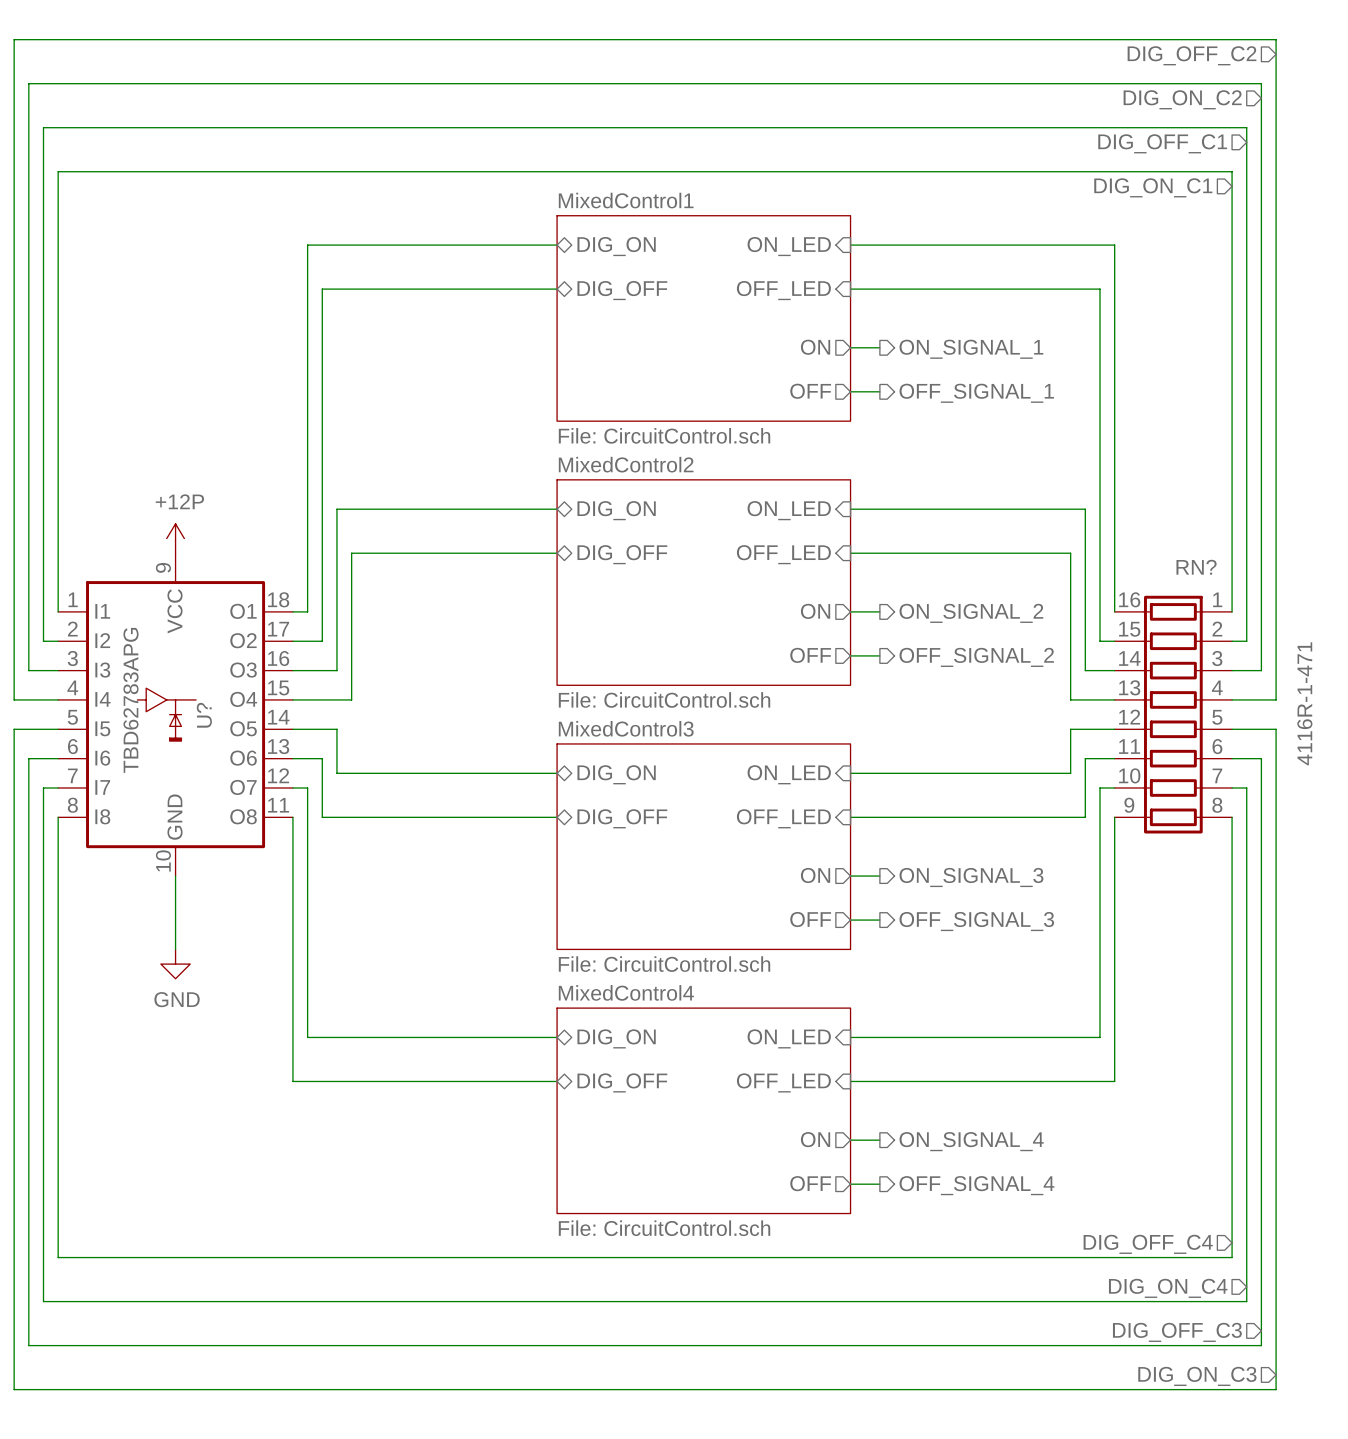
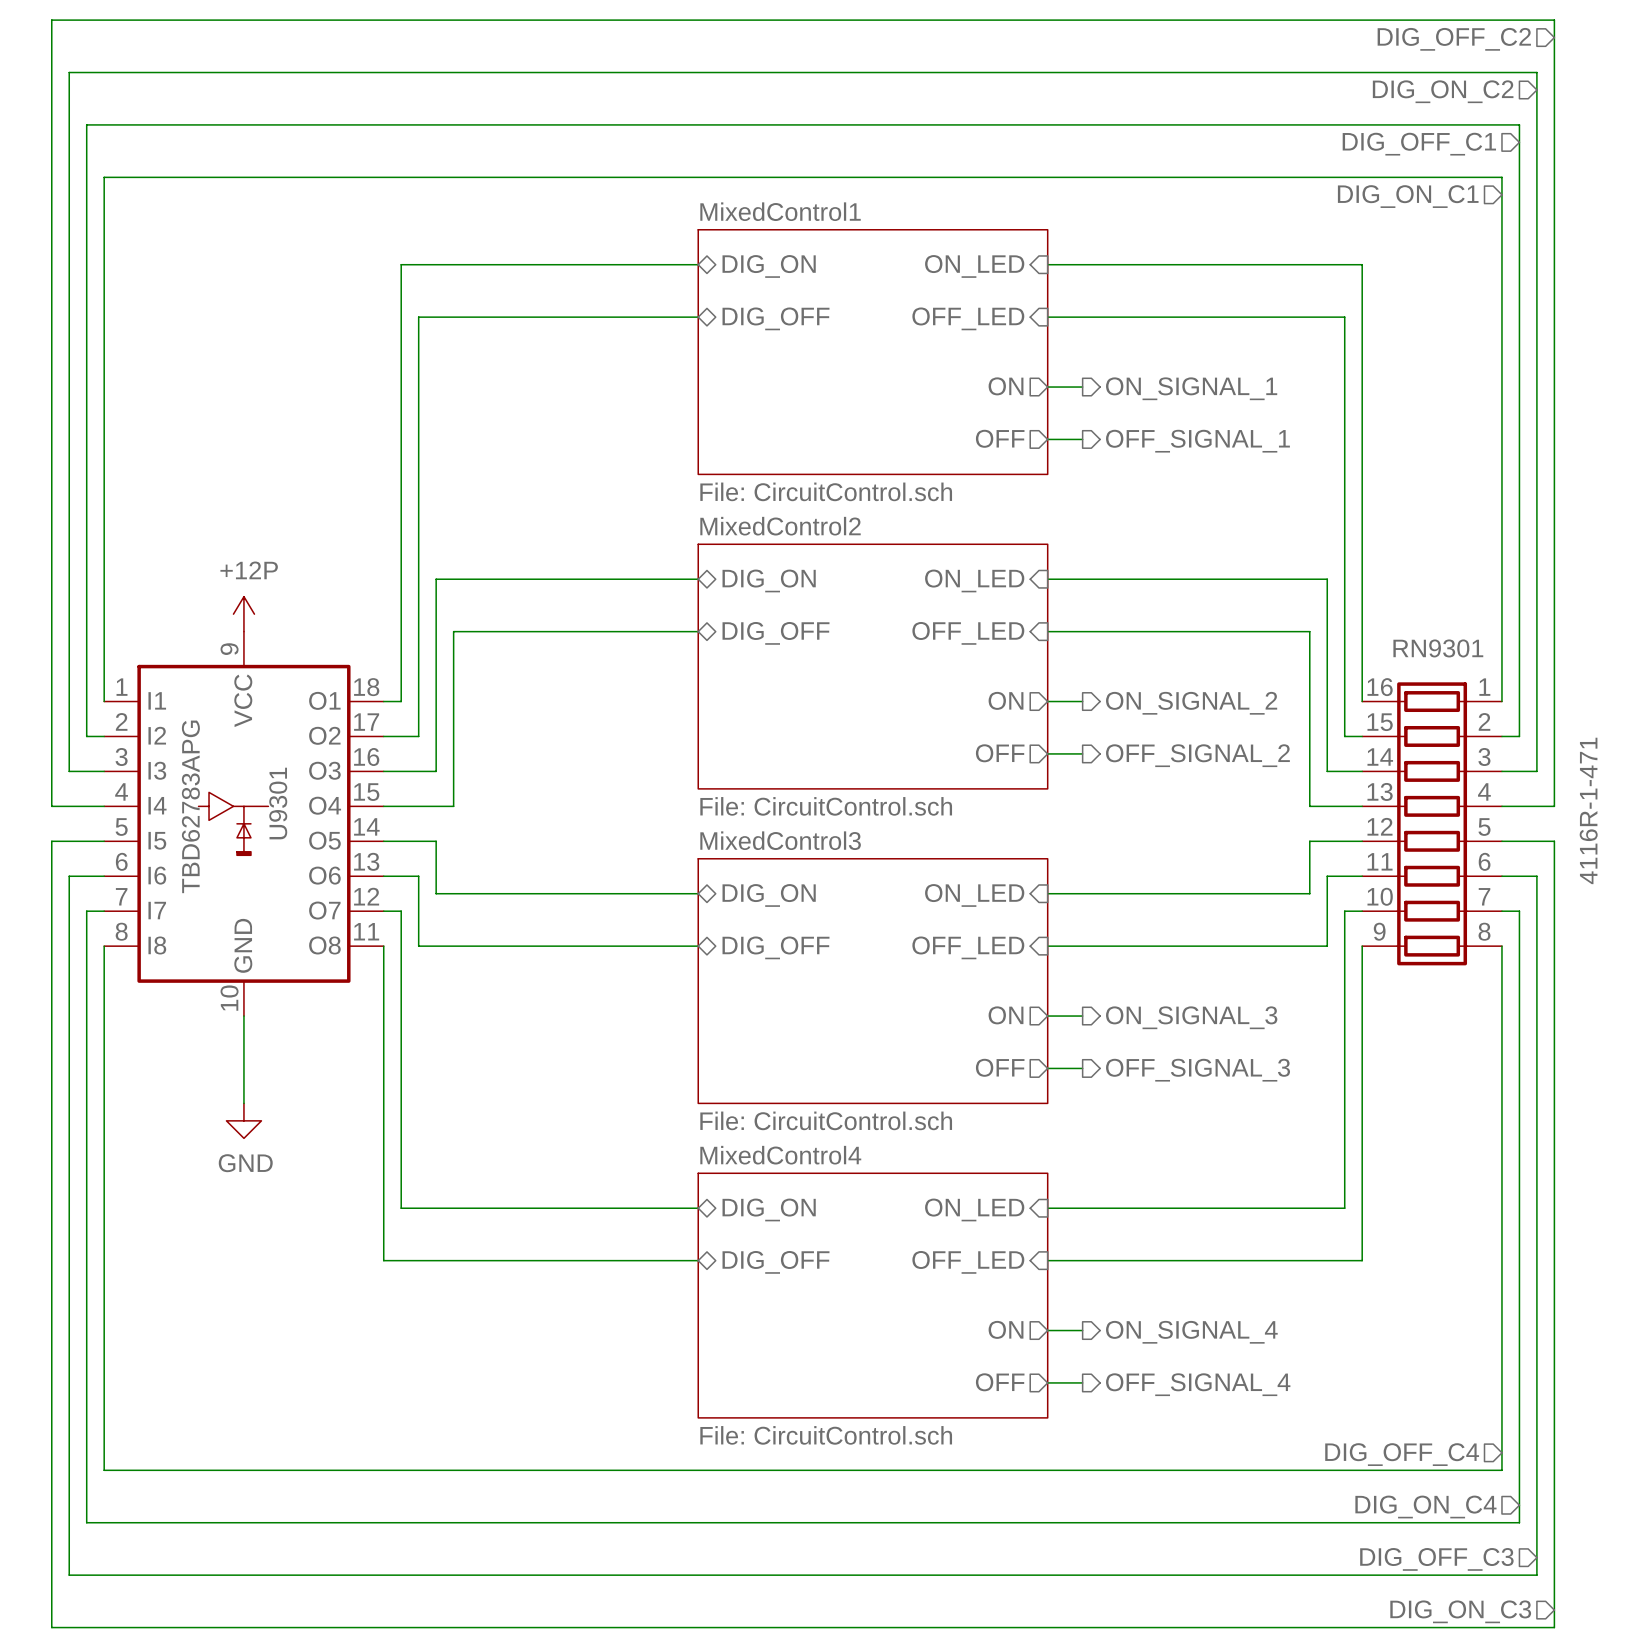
RN? name: RN? (1196, 567) -> RN9301 (1438, 648)
U? name: U? (204, 715) -> U9301 (278, 803)

